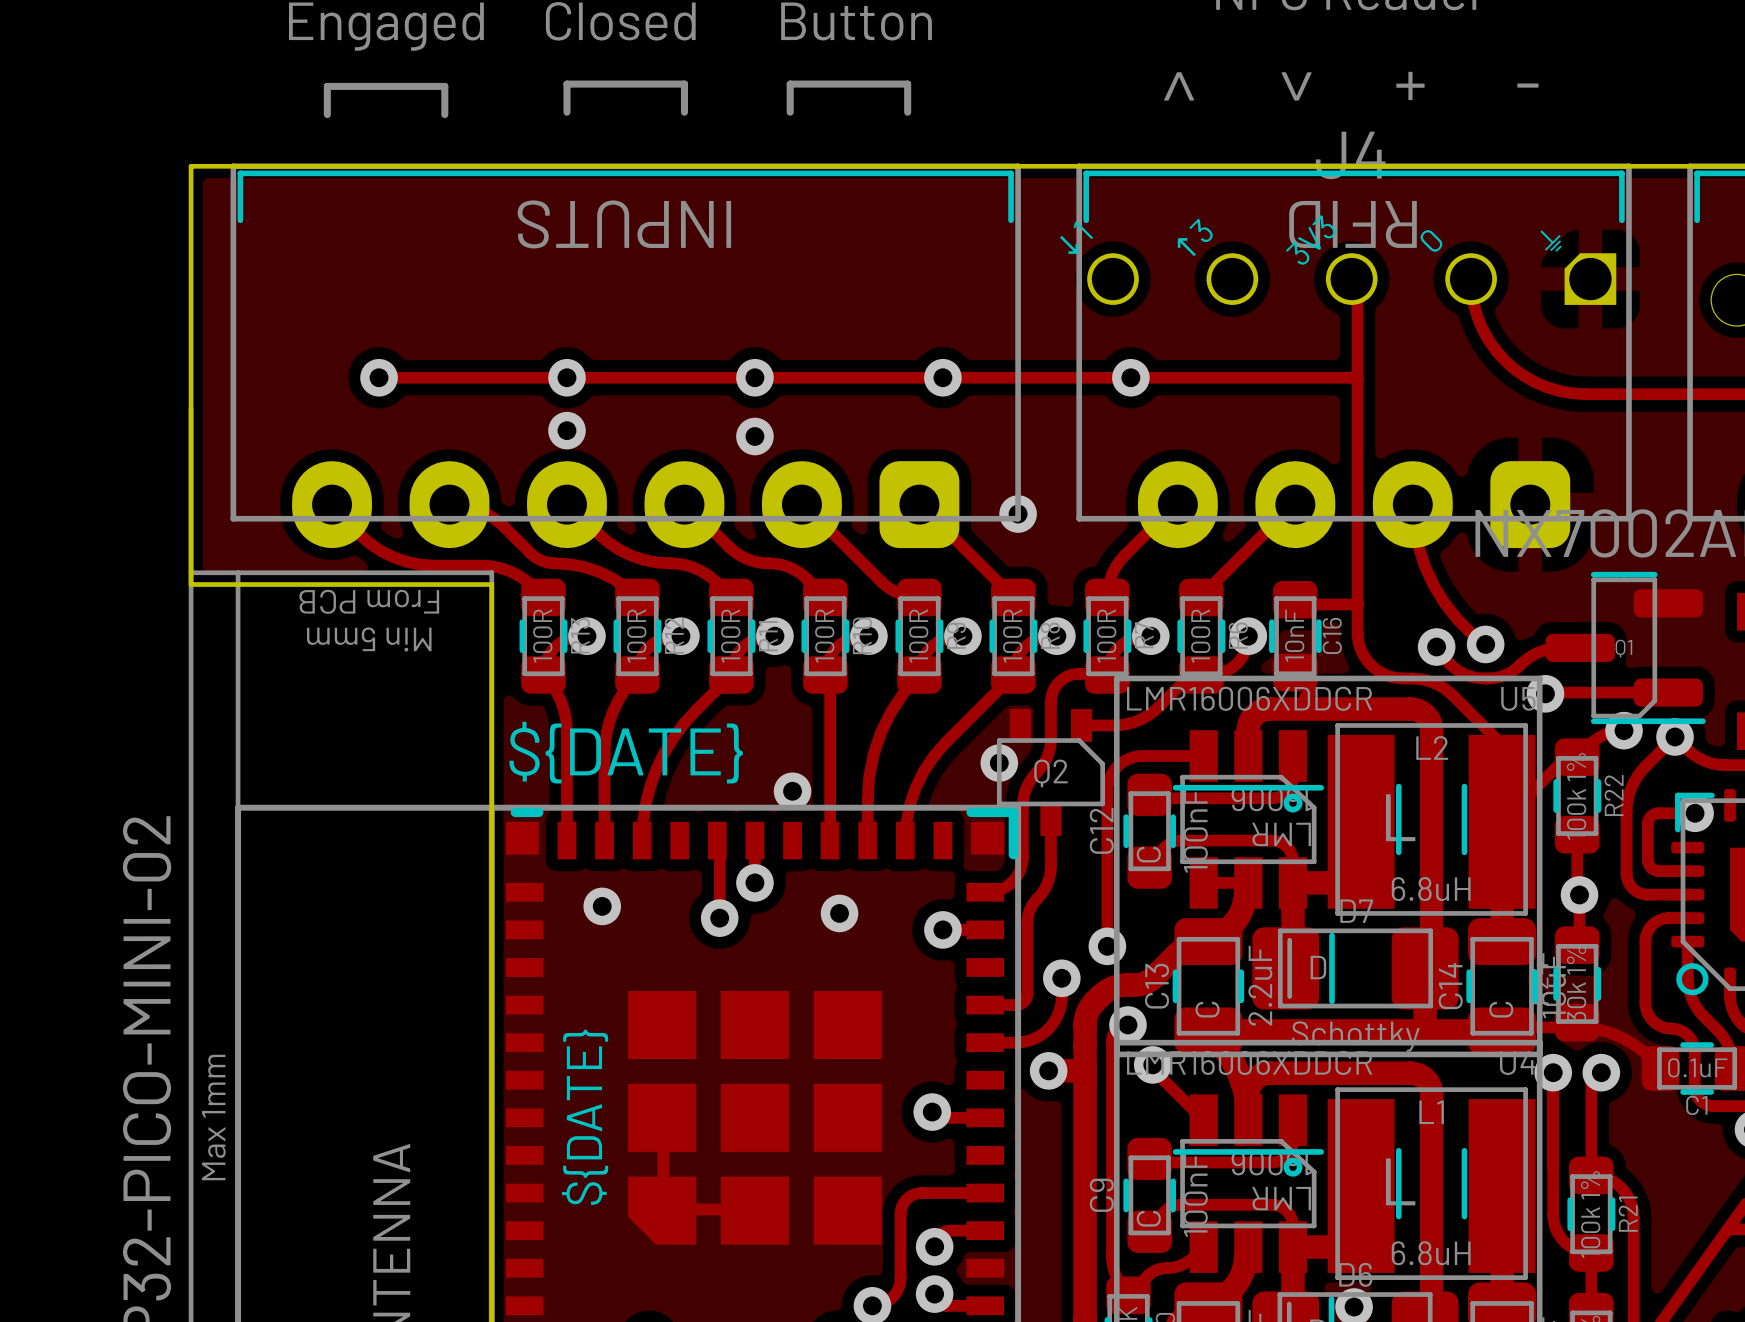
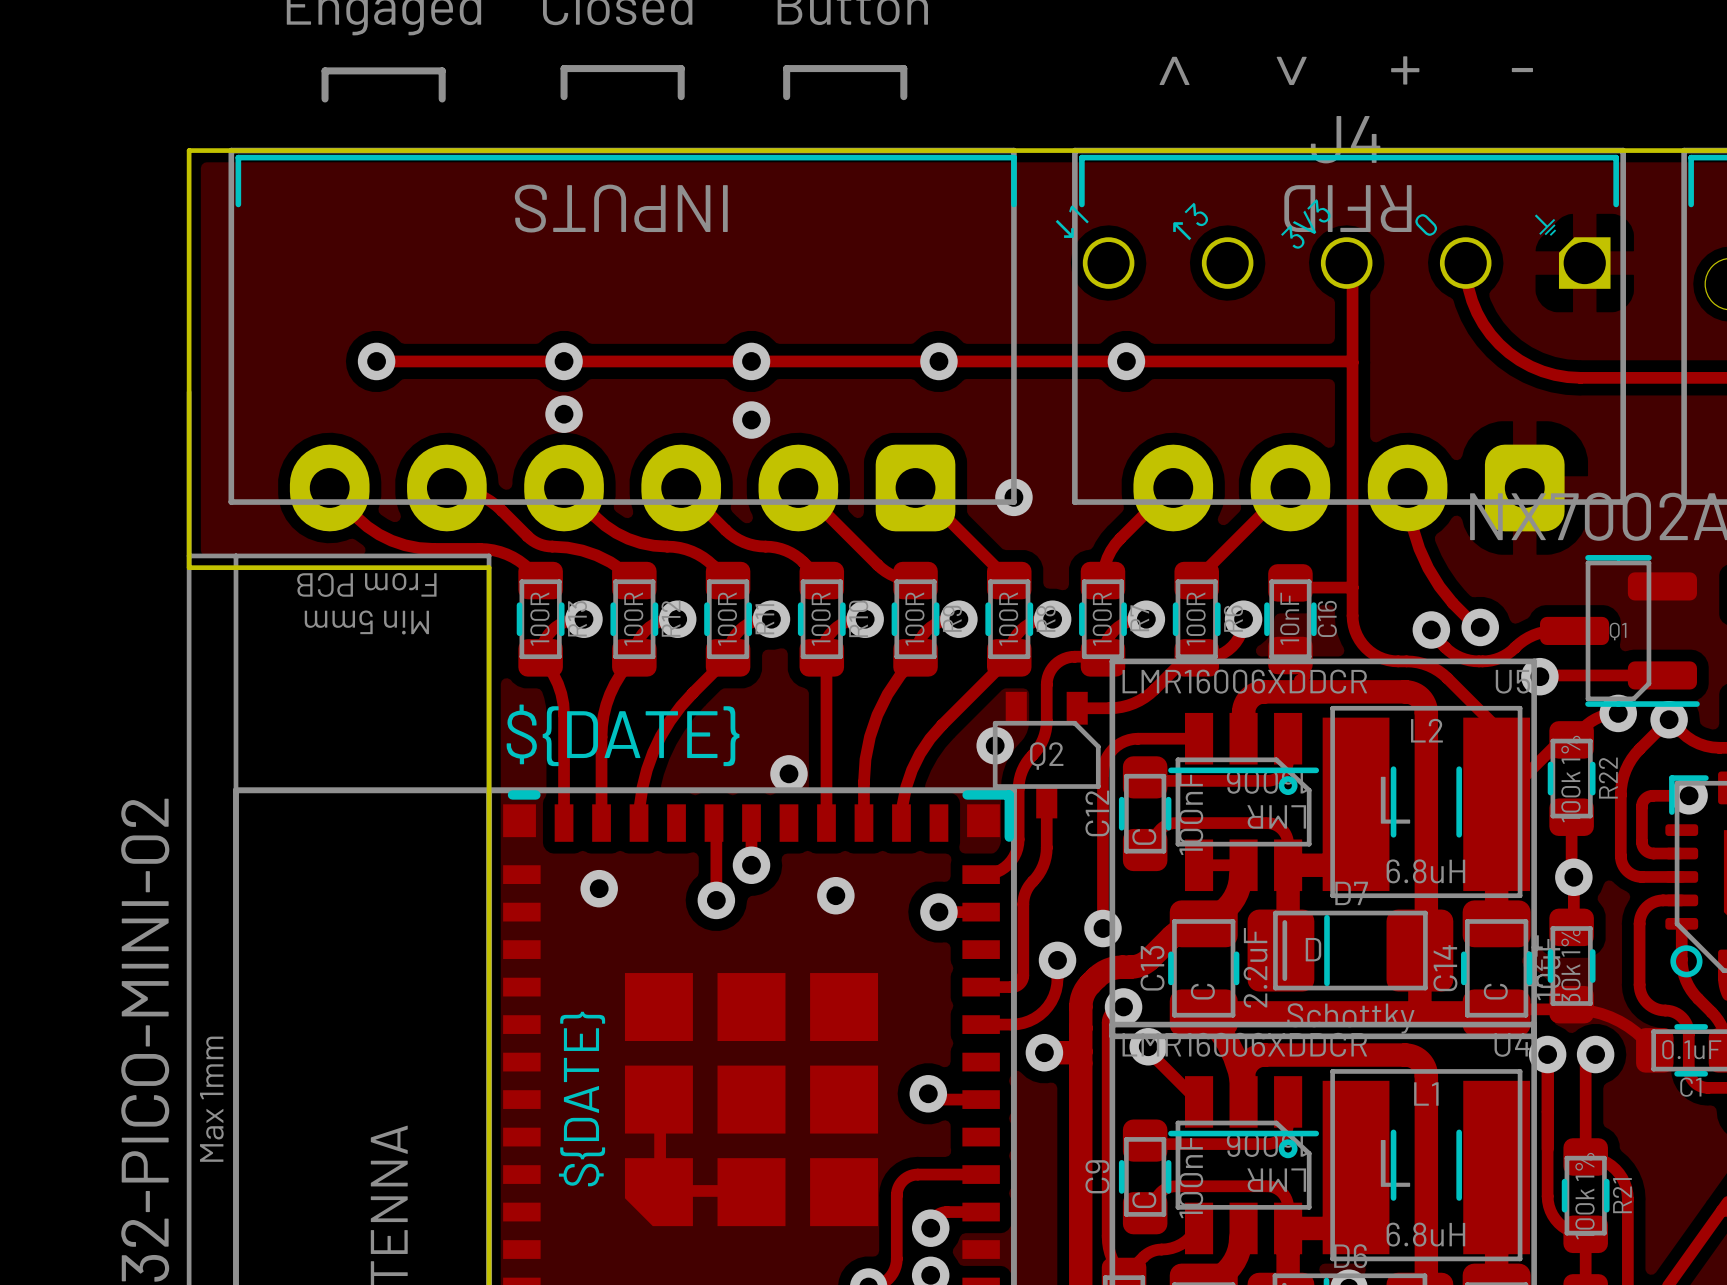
part footprint: [230, 163, 1021, 549] -> [228, 147, 1017, 532]

